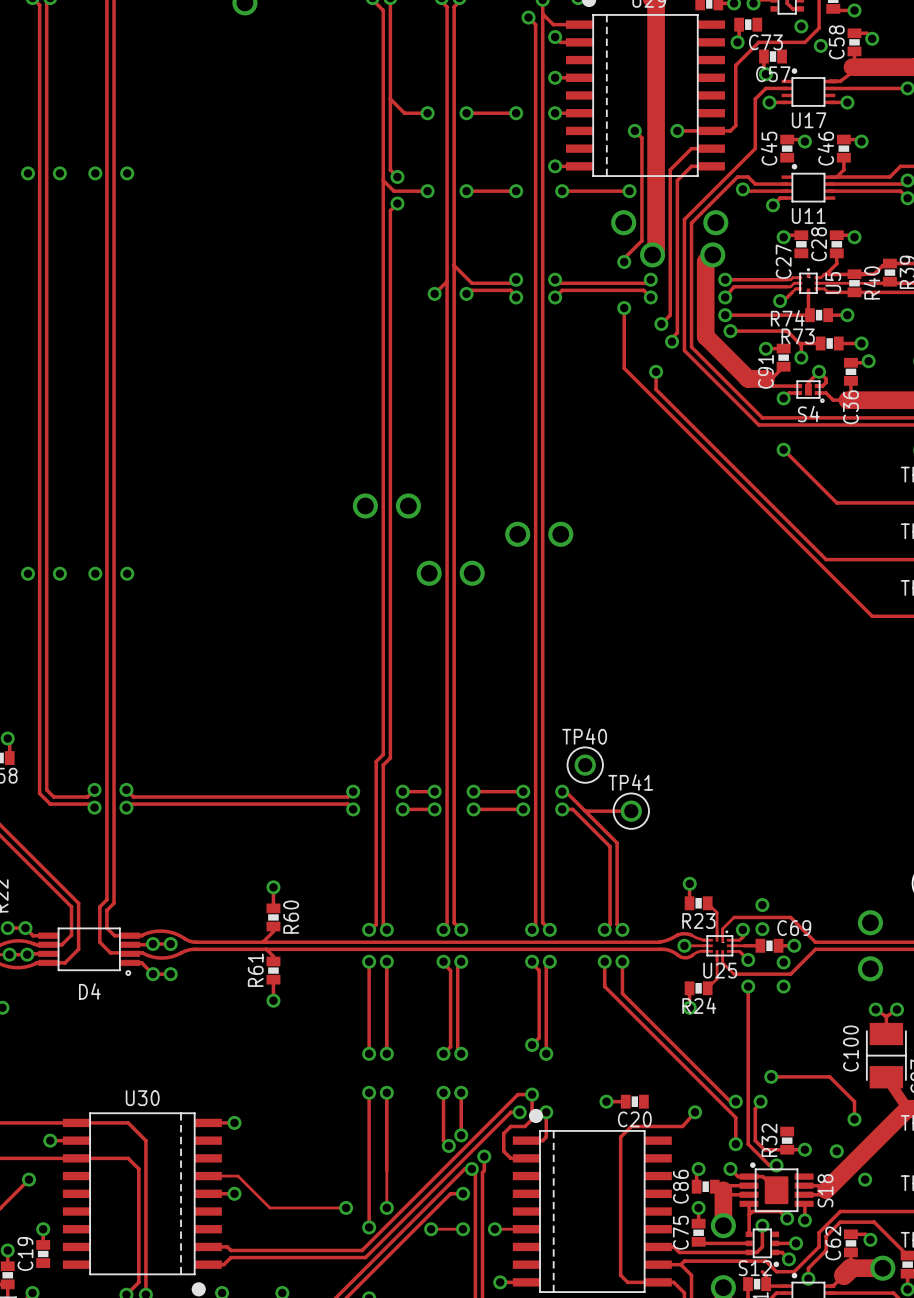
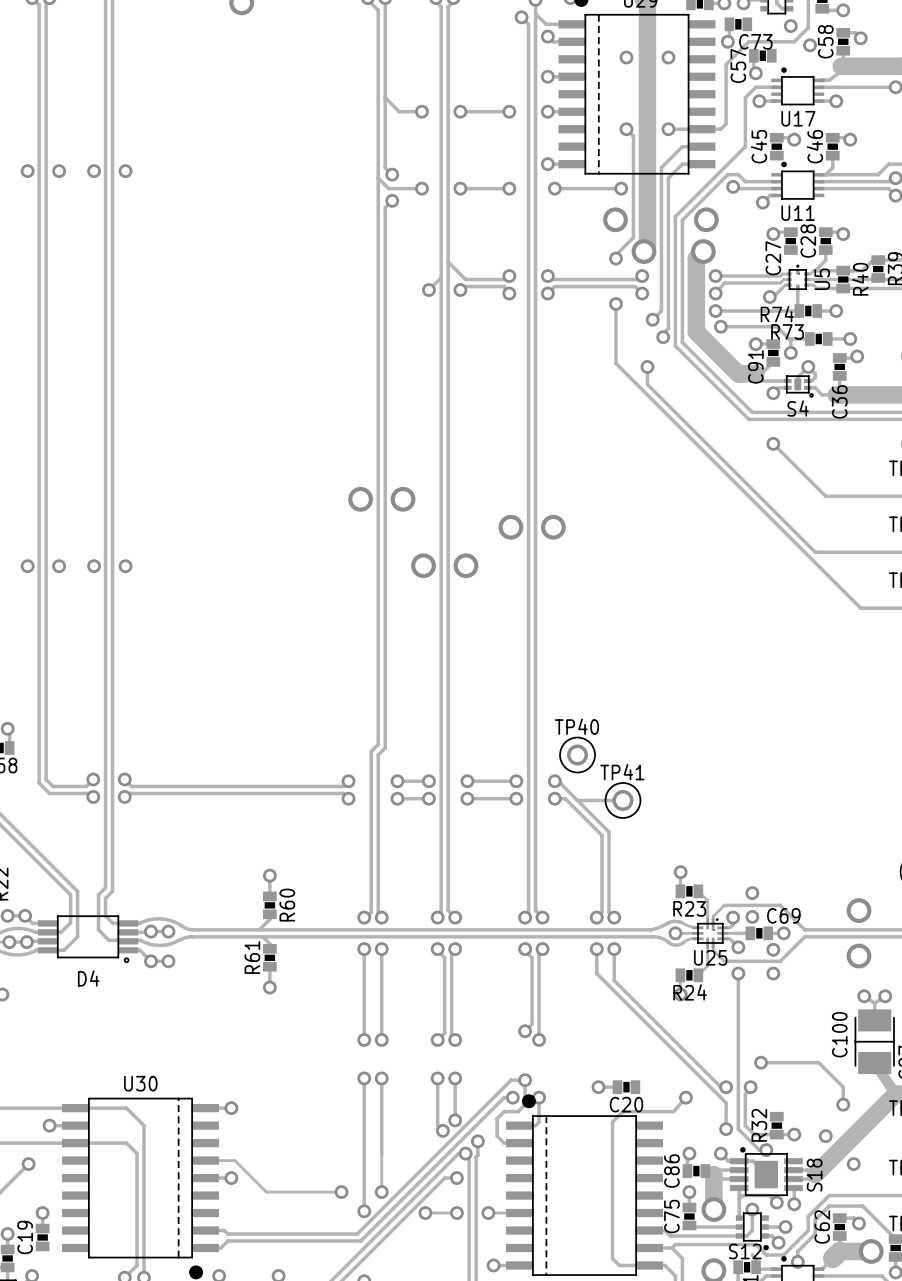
via: none -> (626, 57)
via: none -> (668, 57)
C57 name rotation: 0° (773, 74) -> 90° counterclockwise (738, 65)

